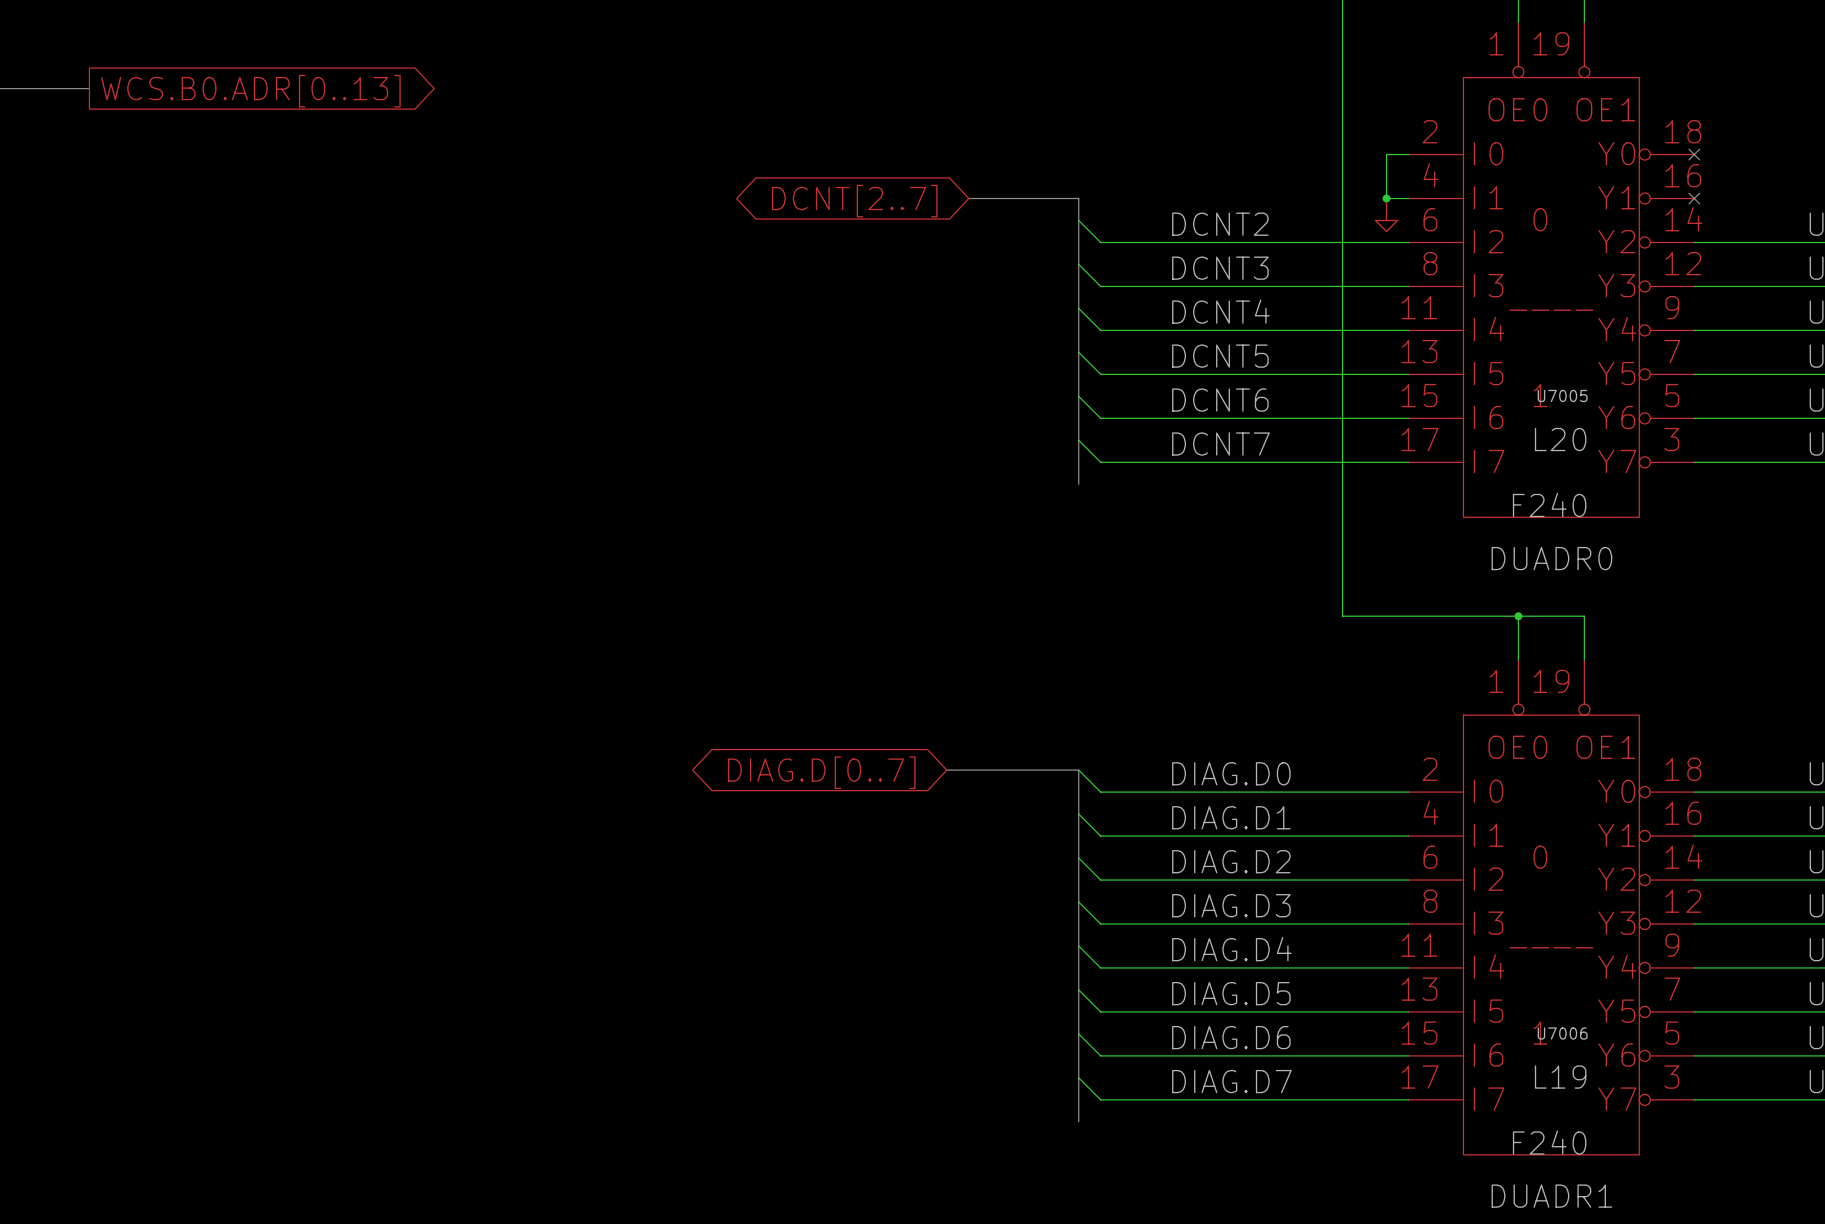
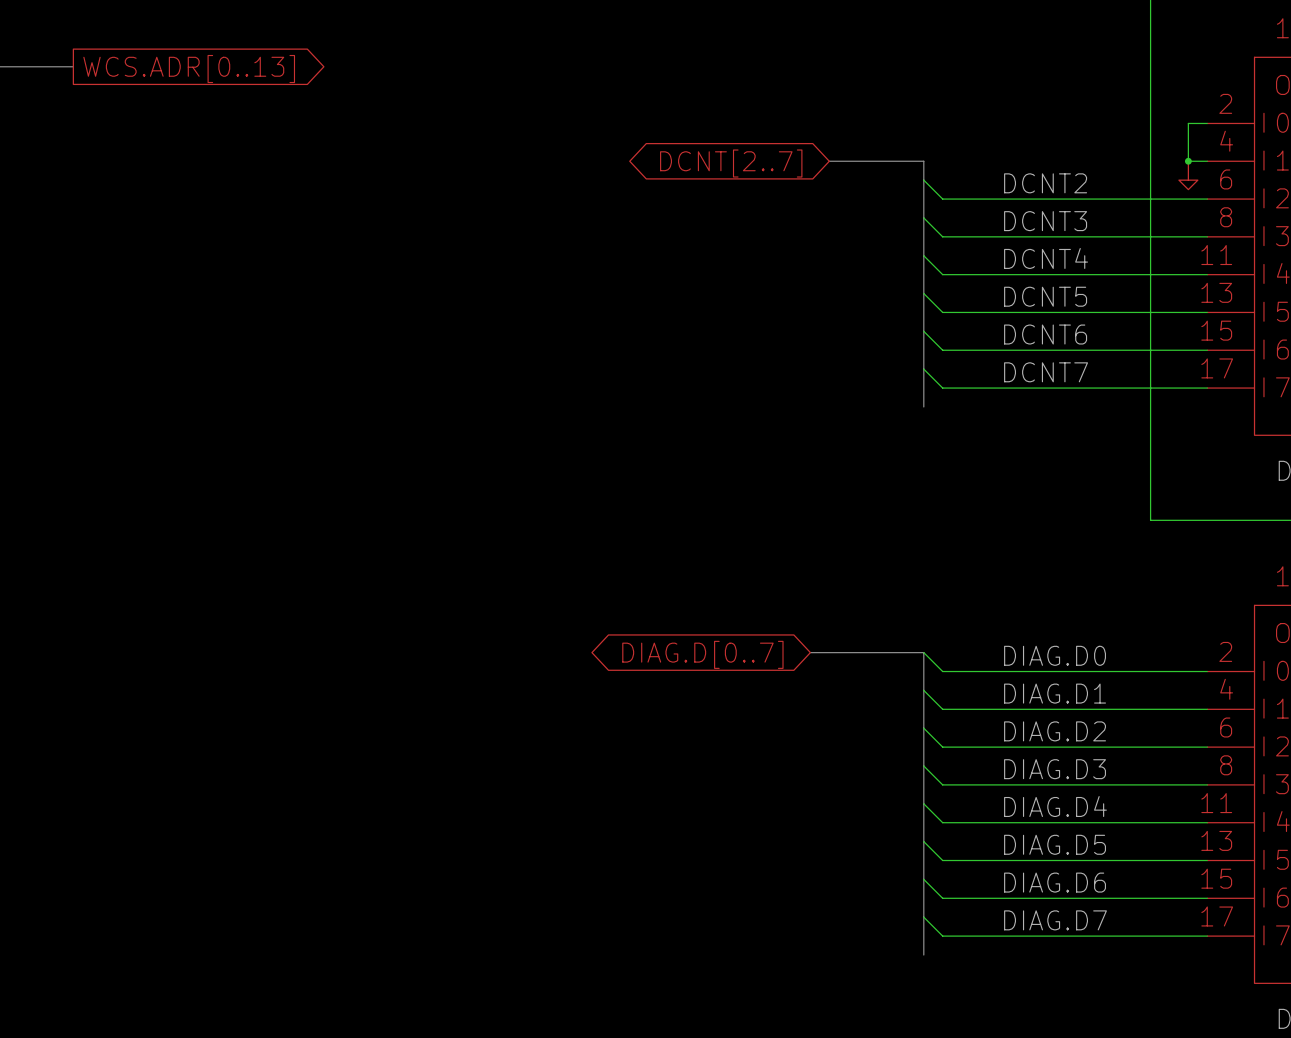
global label: WCS.B0.ADR[0..13] (250, 91) -> WCS.ADR[0..13] (189, 69)

